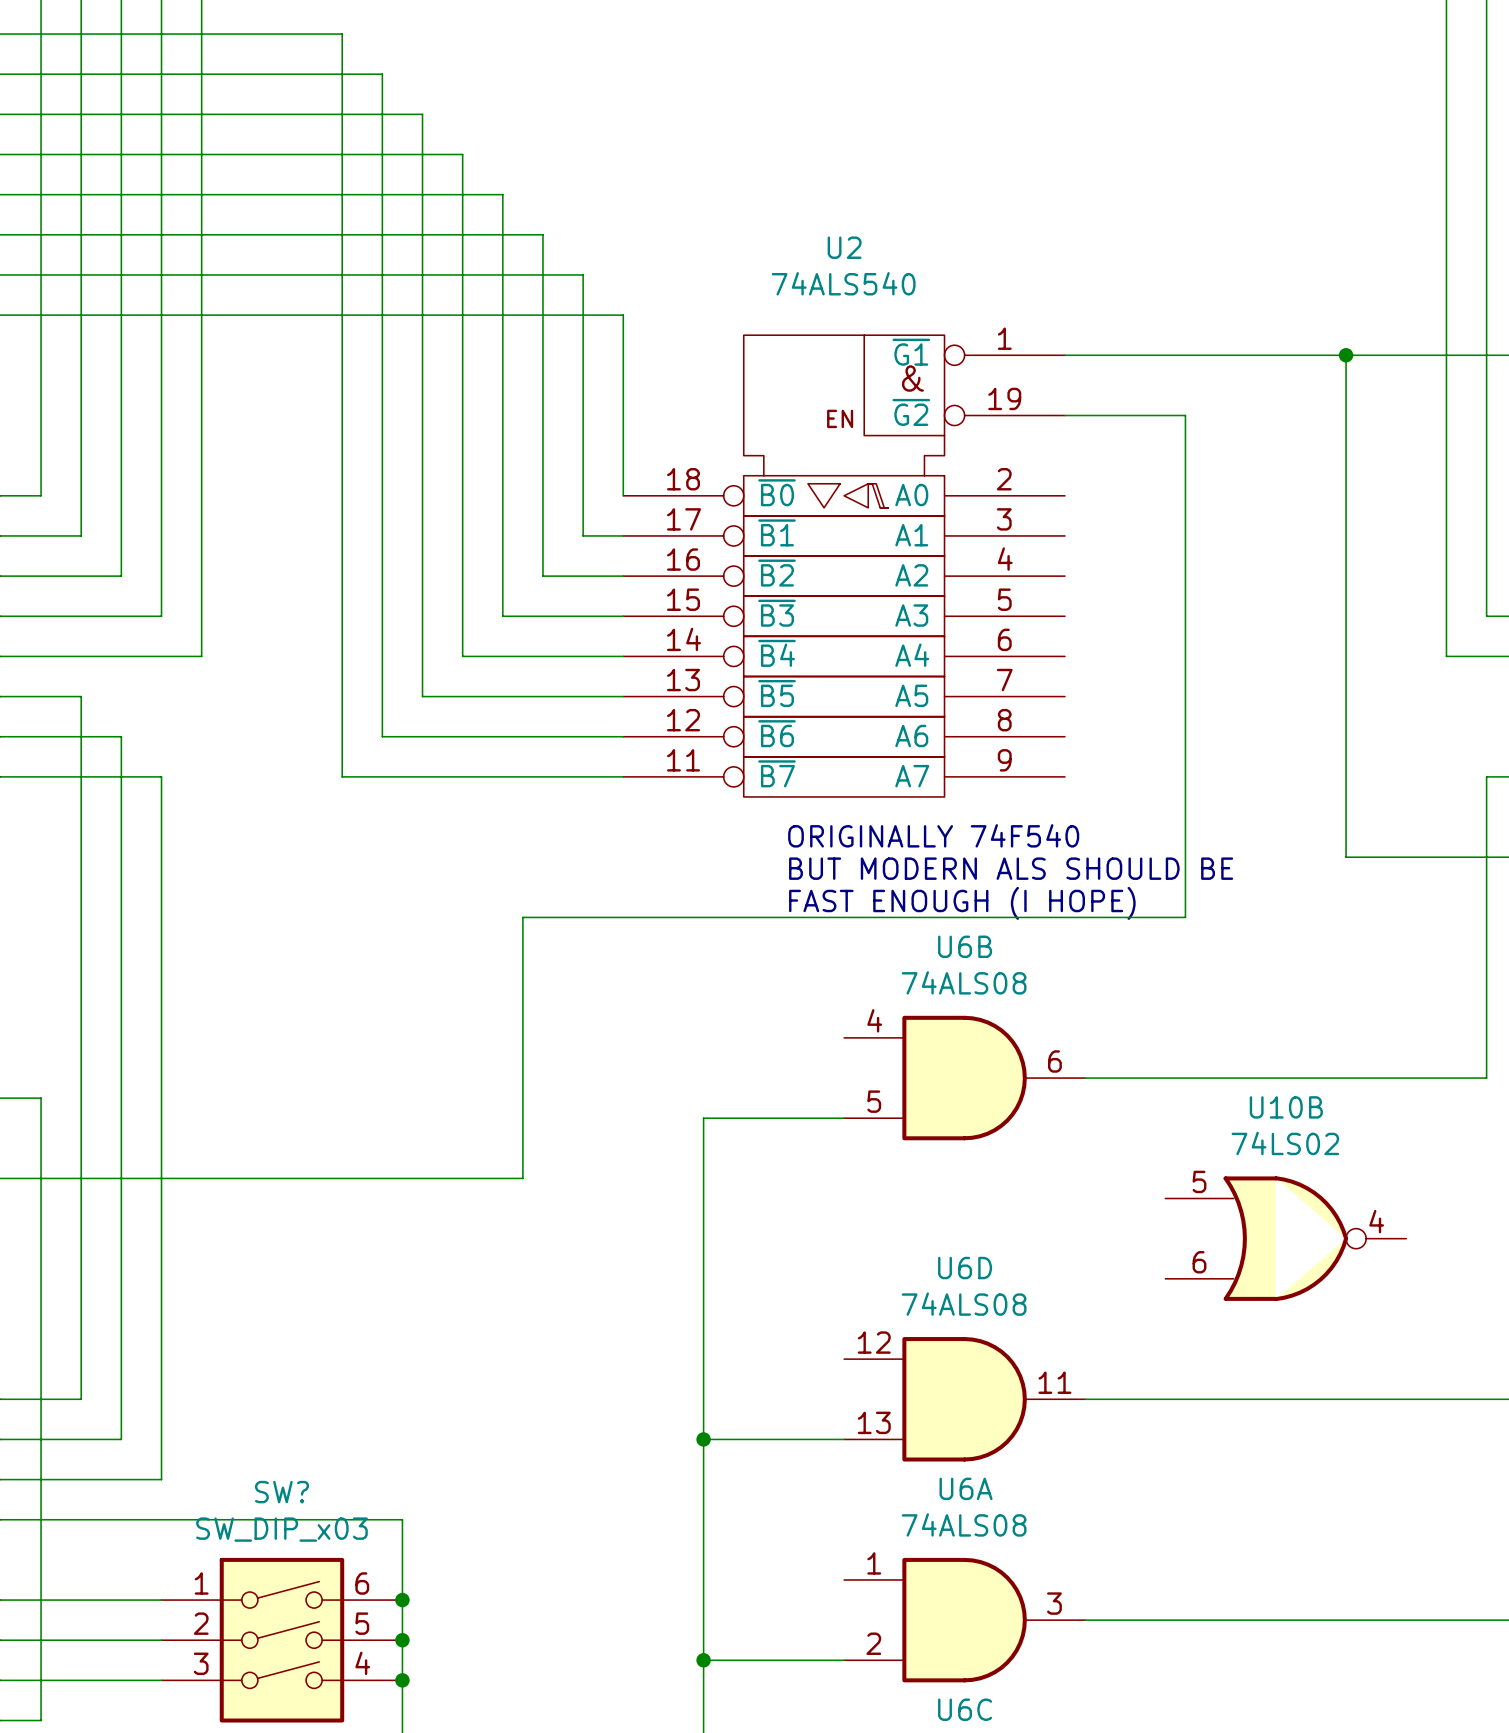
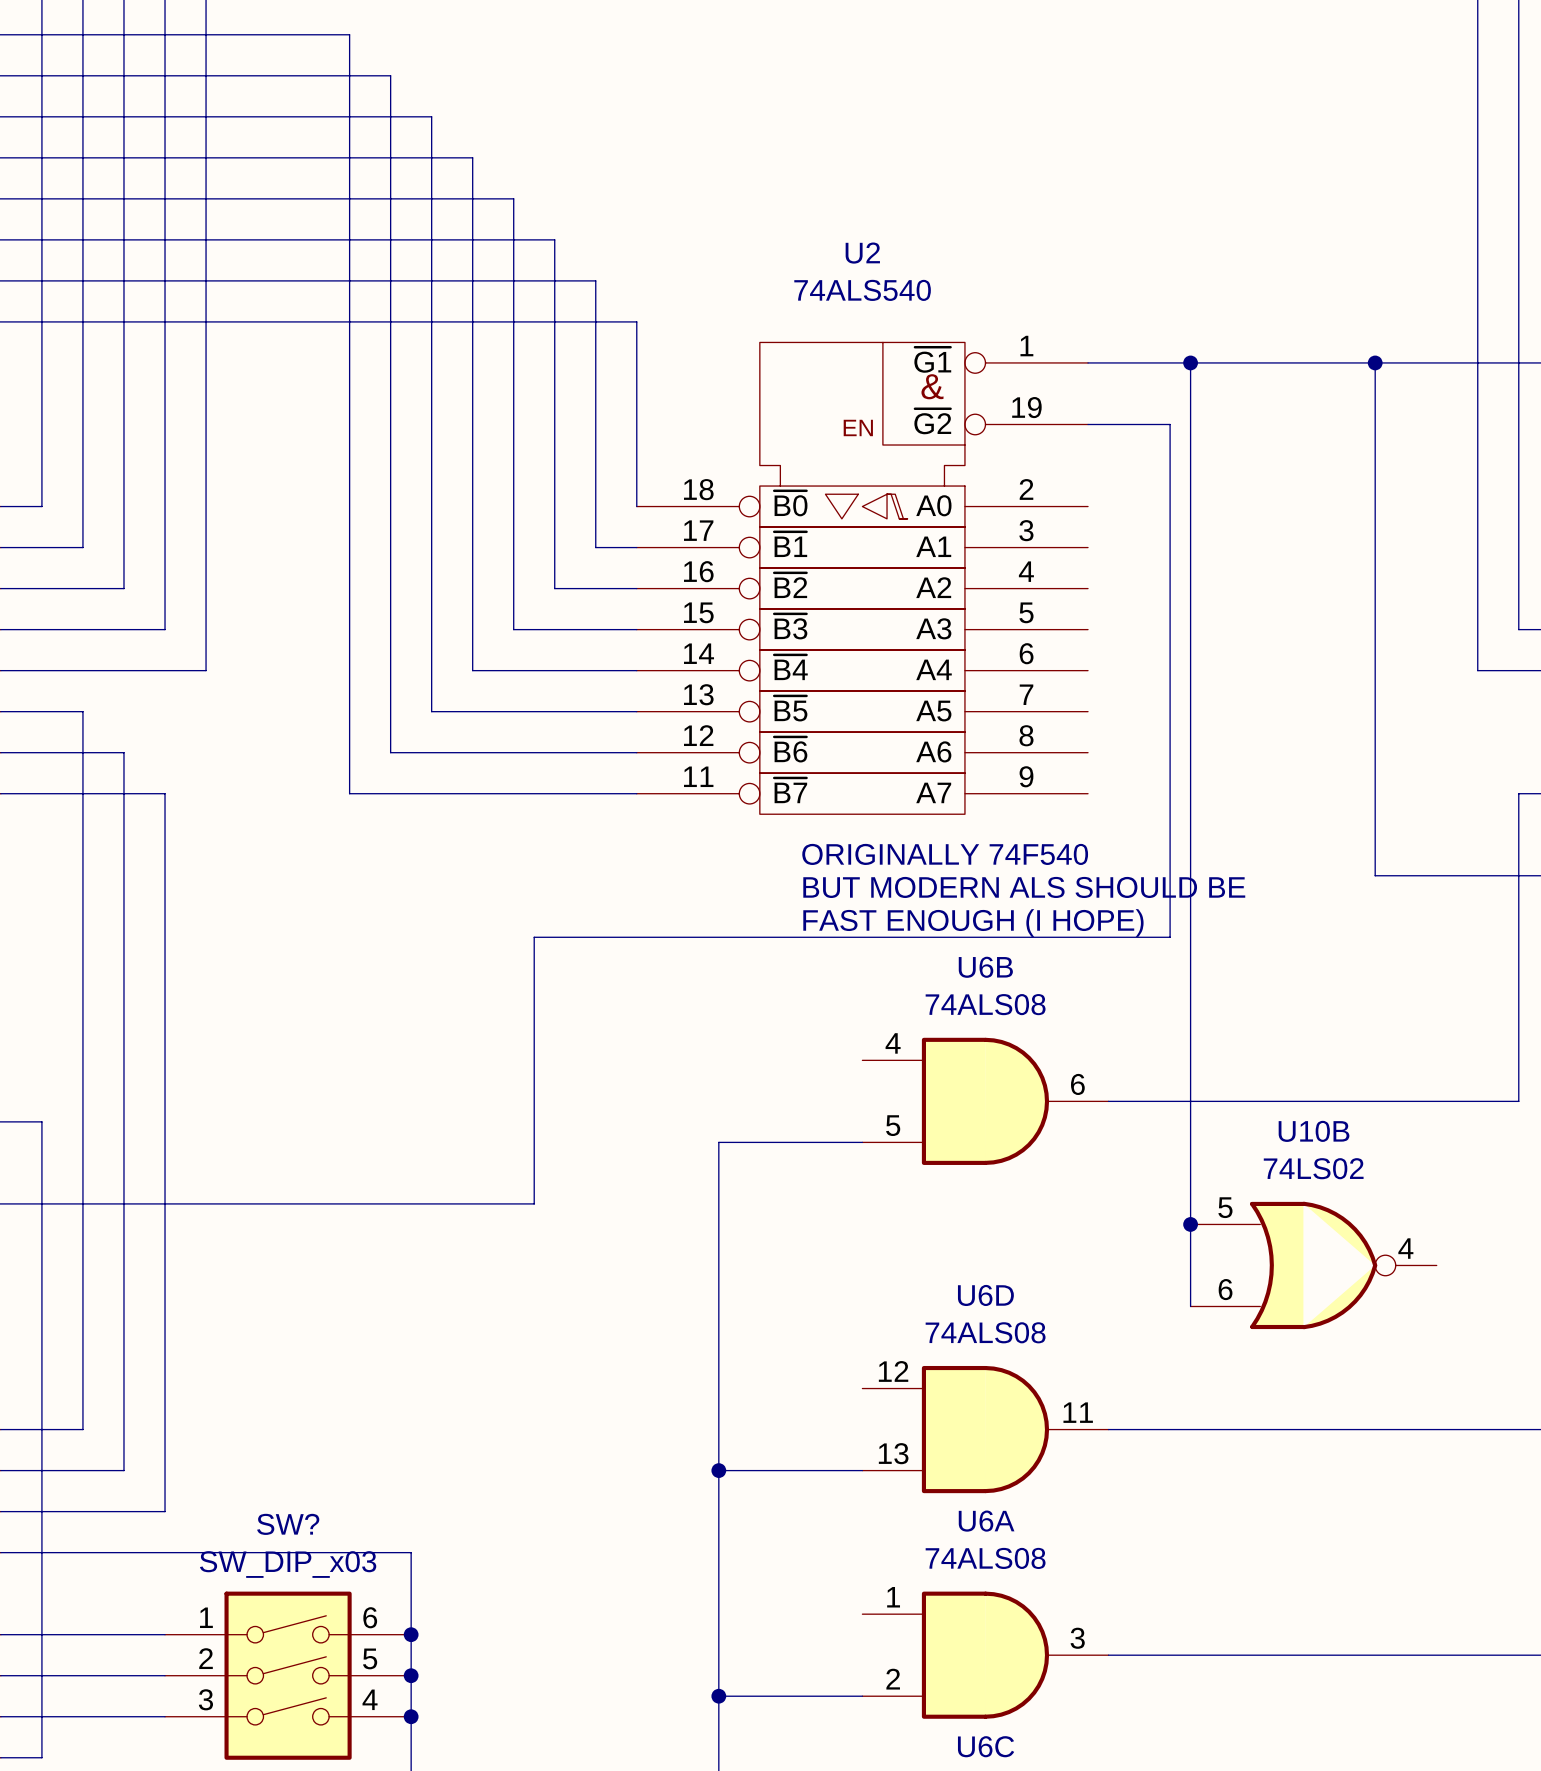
wire: none -> (1190, 362) (1190, 1306)
junction: none -> (1190, 362)
wire: (1145, 415) (1185, 415) (1185, 917) (1145, 917) -> (1170, 424) (1170, 937)
junction: none -> (1190, 1224)

